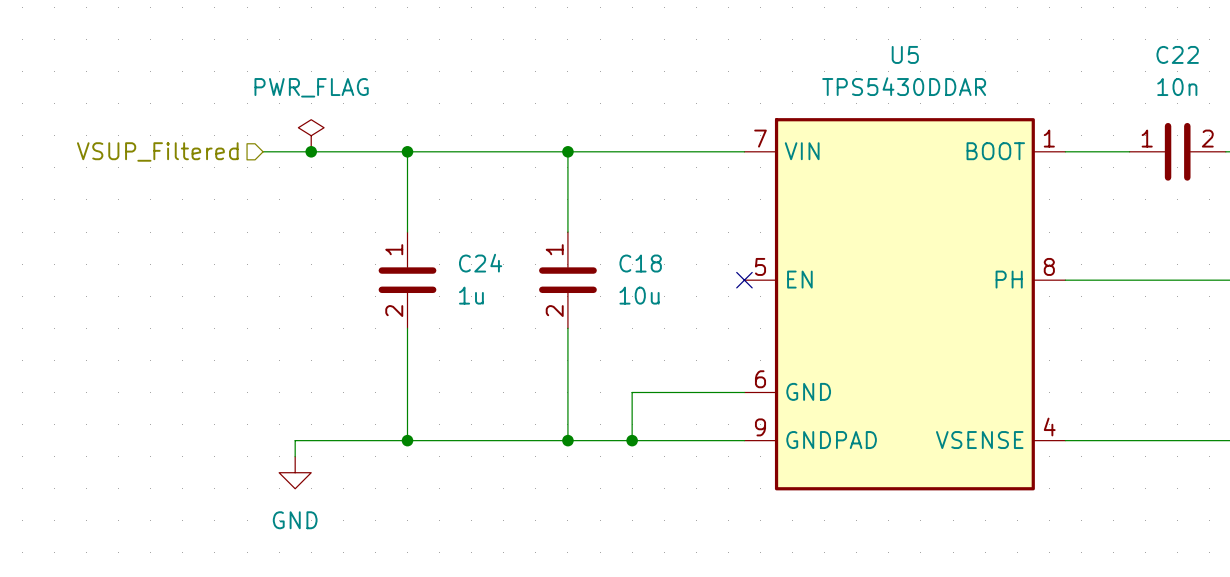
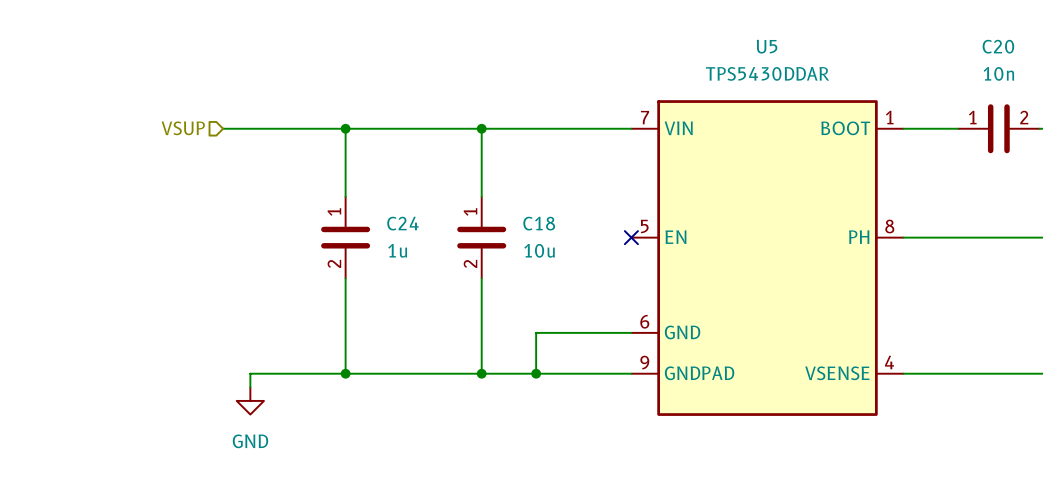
C22 name: C22 (1177, 54) -> C20 (998, 46)
power symbol: PWR_FLAG (311, 135) -> none
hierarchical label: VSUP_Filtered (157, 151) -> VSUP (183, 128)
junction: (311, 151) -> none

